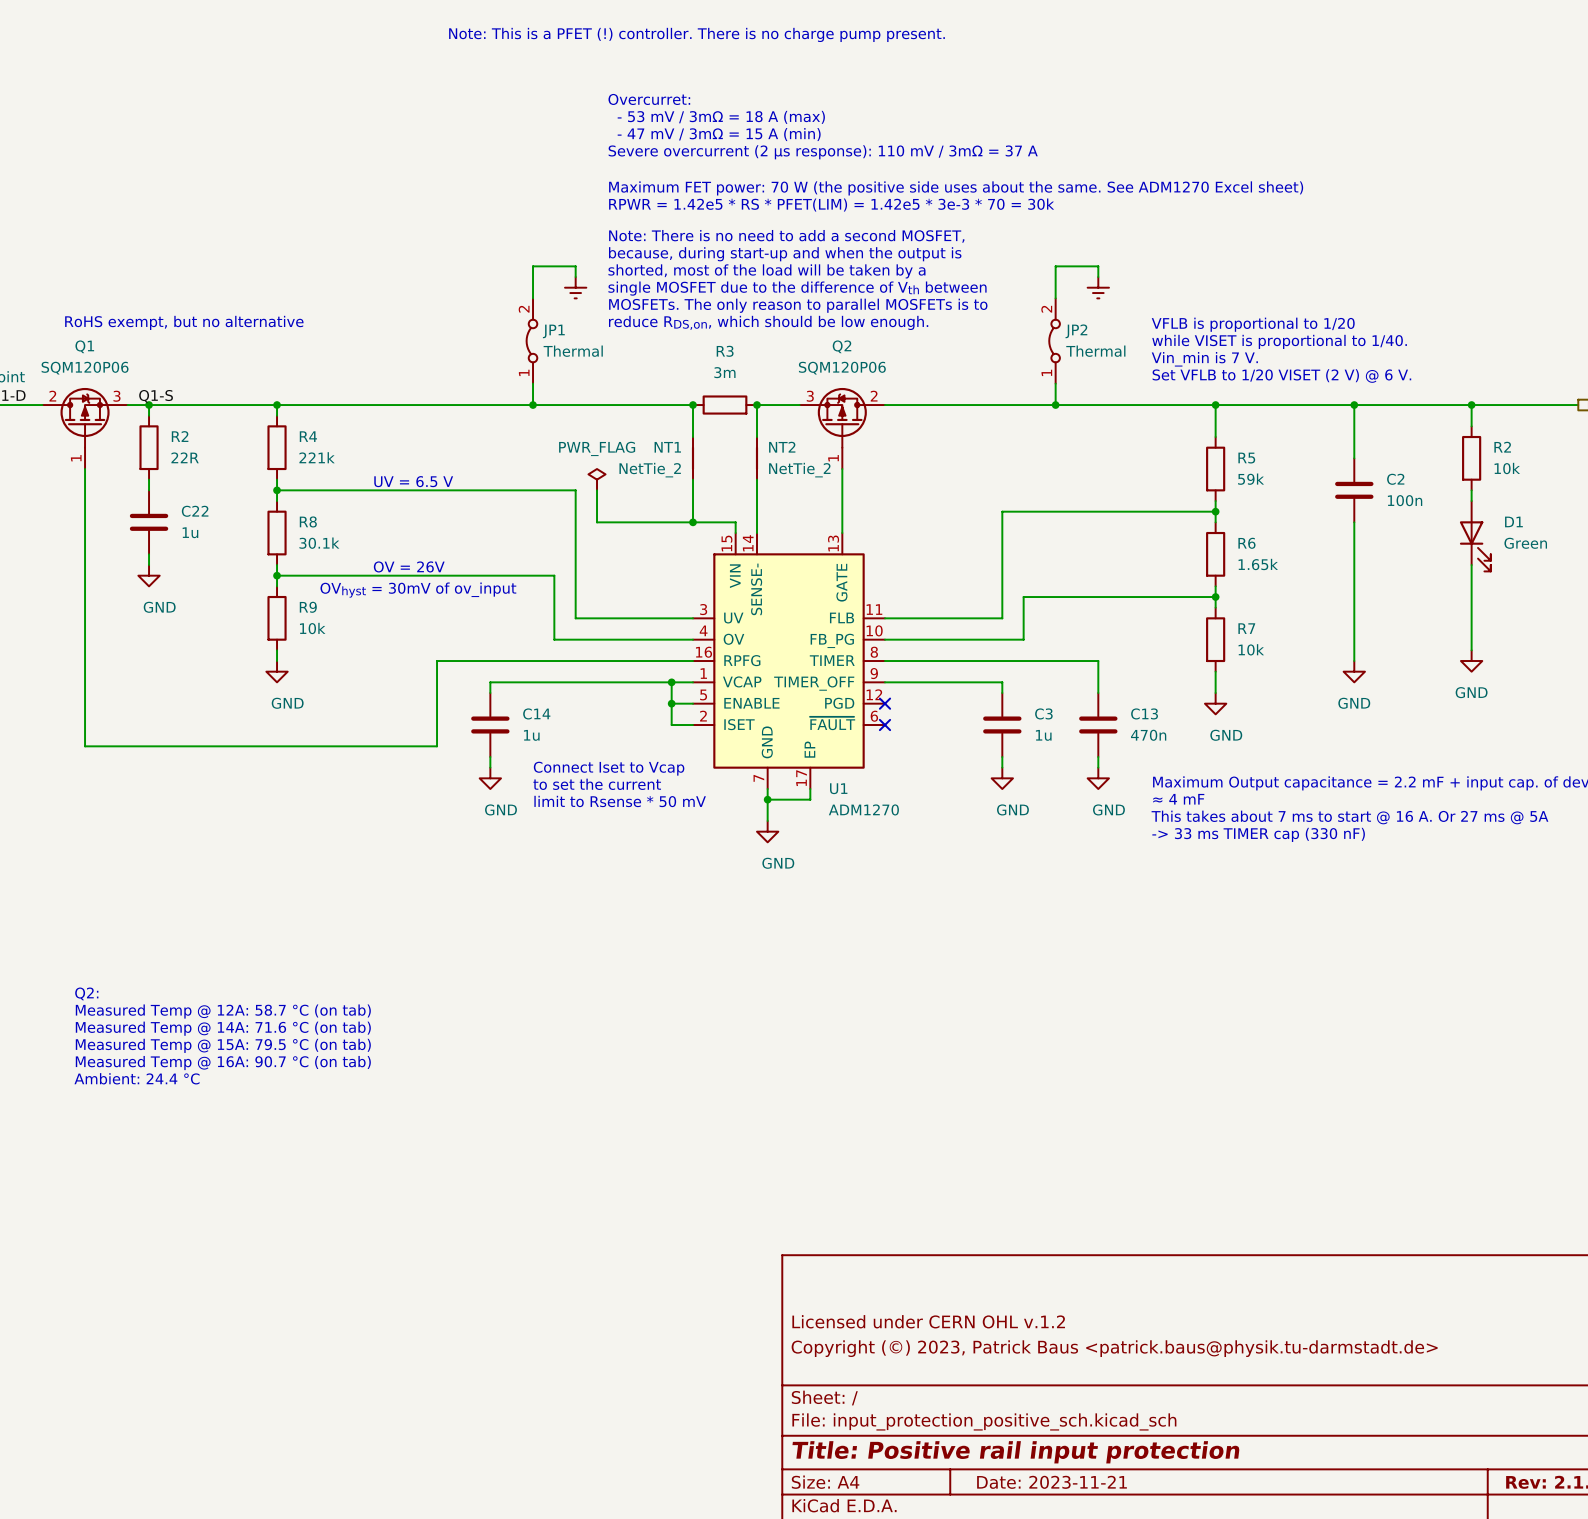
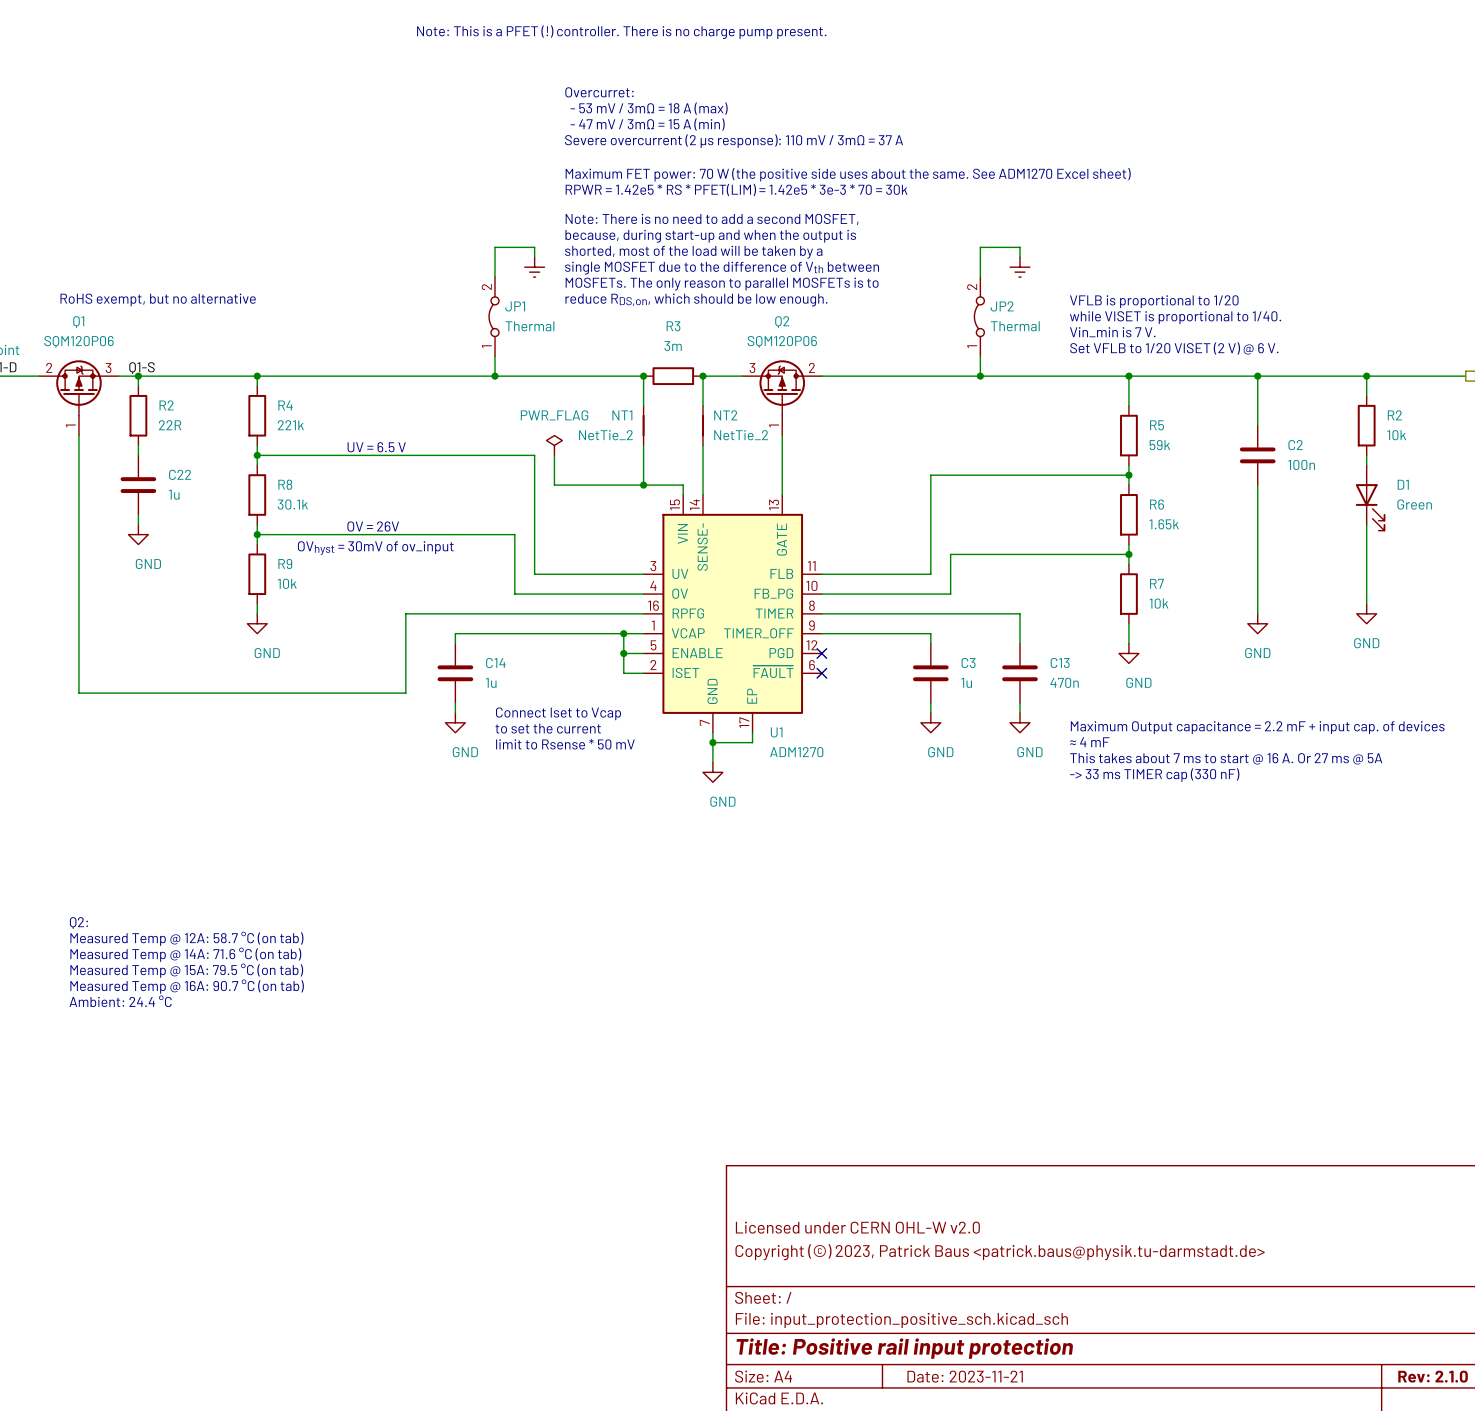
title block: Licensed under CERN OHL v.1.2 (928, 1321) -> Licensed under CERN OHL-W v2.0 (857, 1227)

